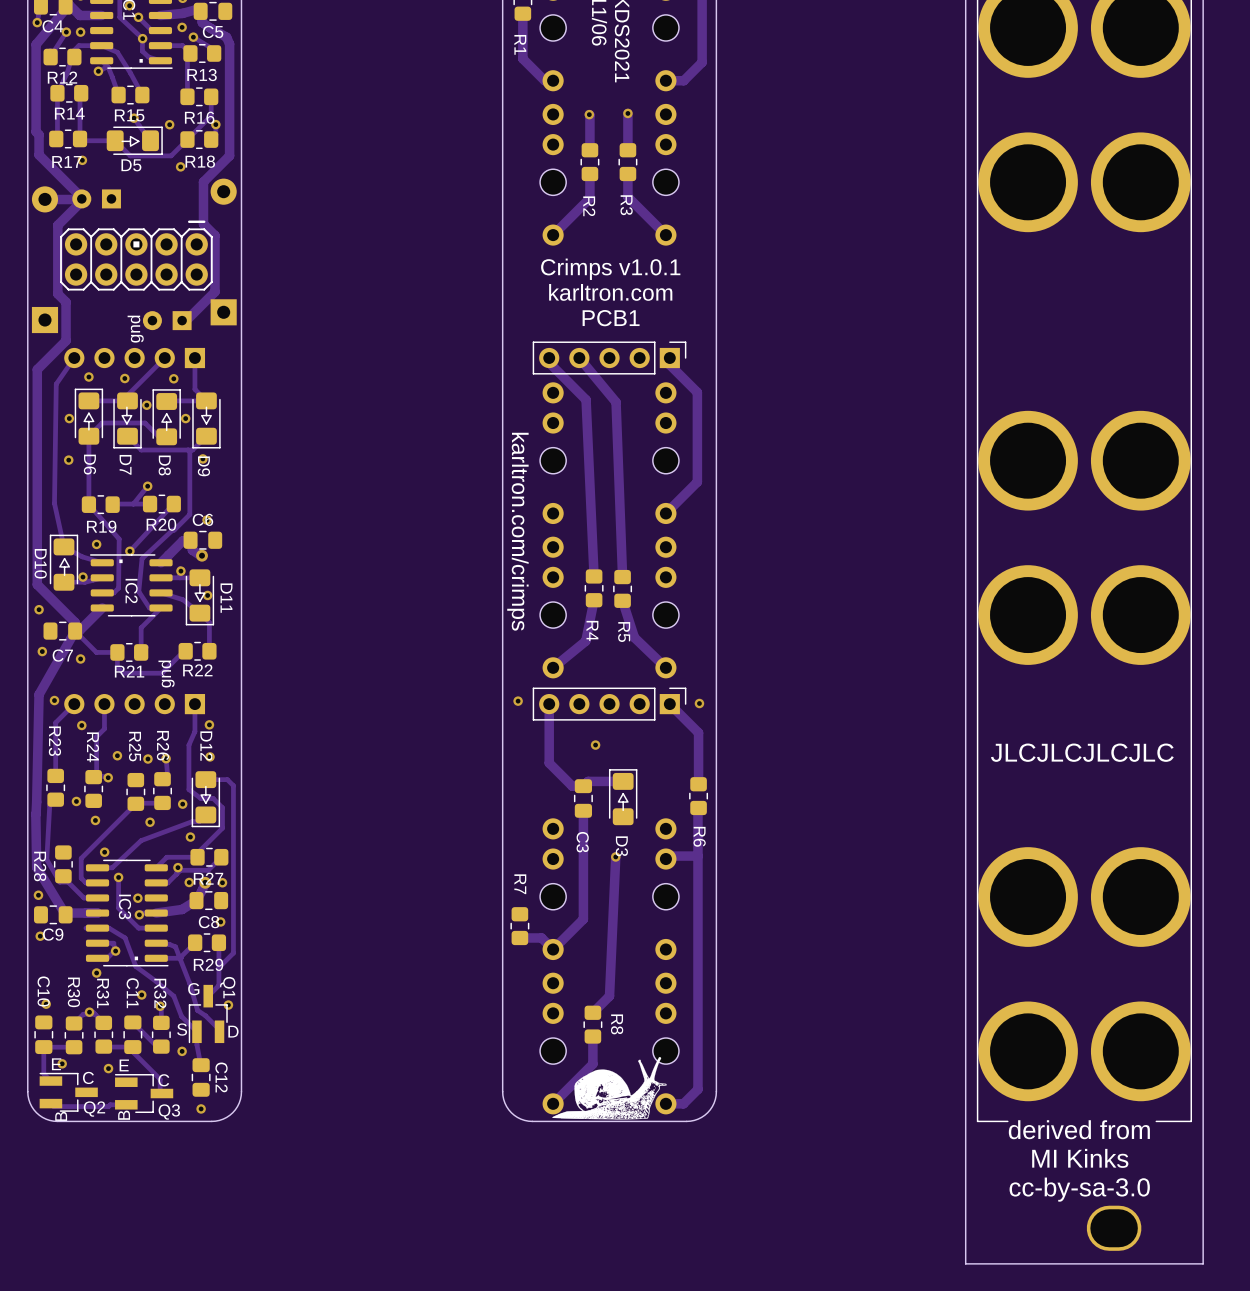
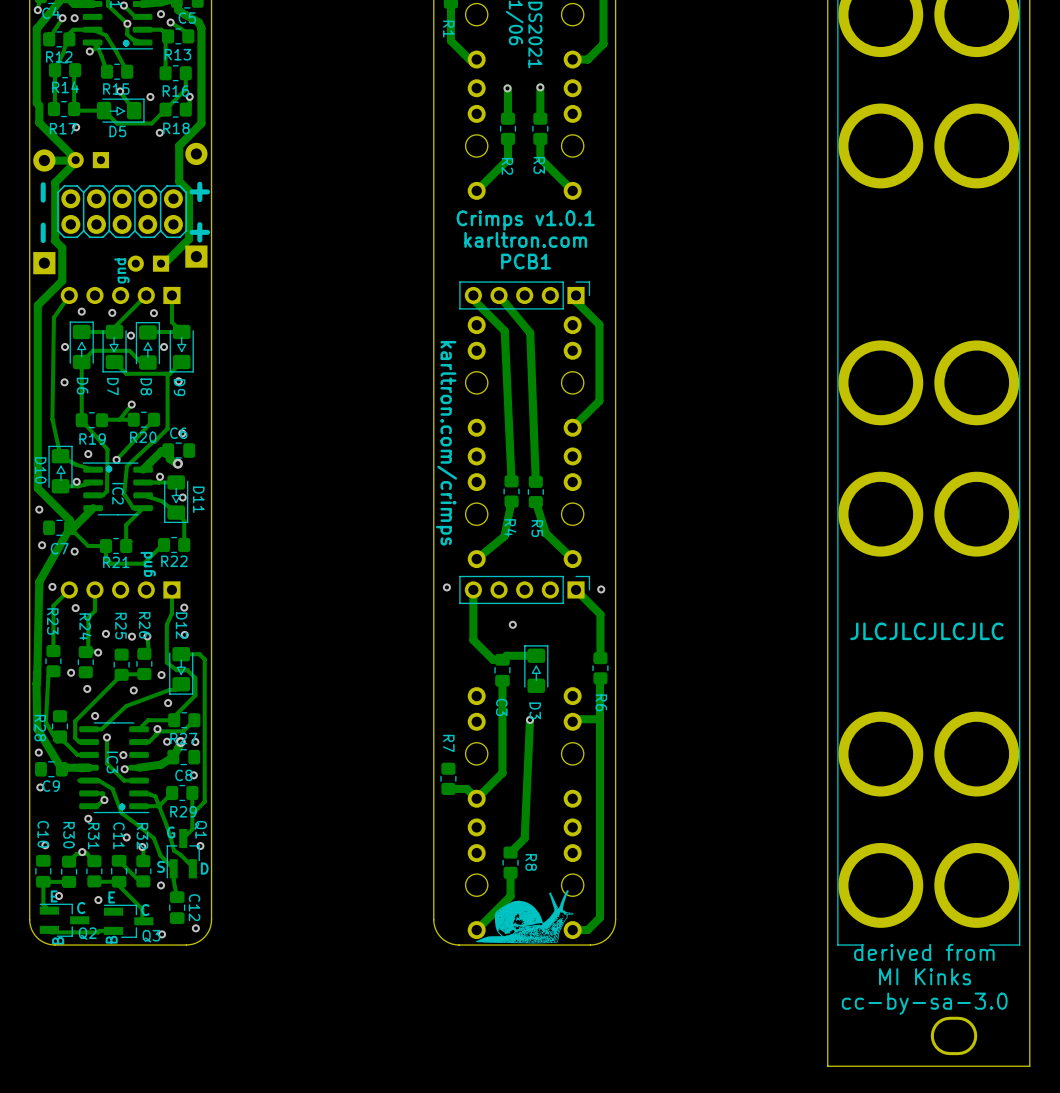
part footprint: [60, 220, 213, 291] -> [57, 185, 188, 239]
text: none -> - - (43, 212)
text: none -> + + (199, 212)
via: none -> (195, 928)
via: none -> (162, 934)
via: (201, 1108) -> none

